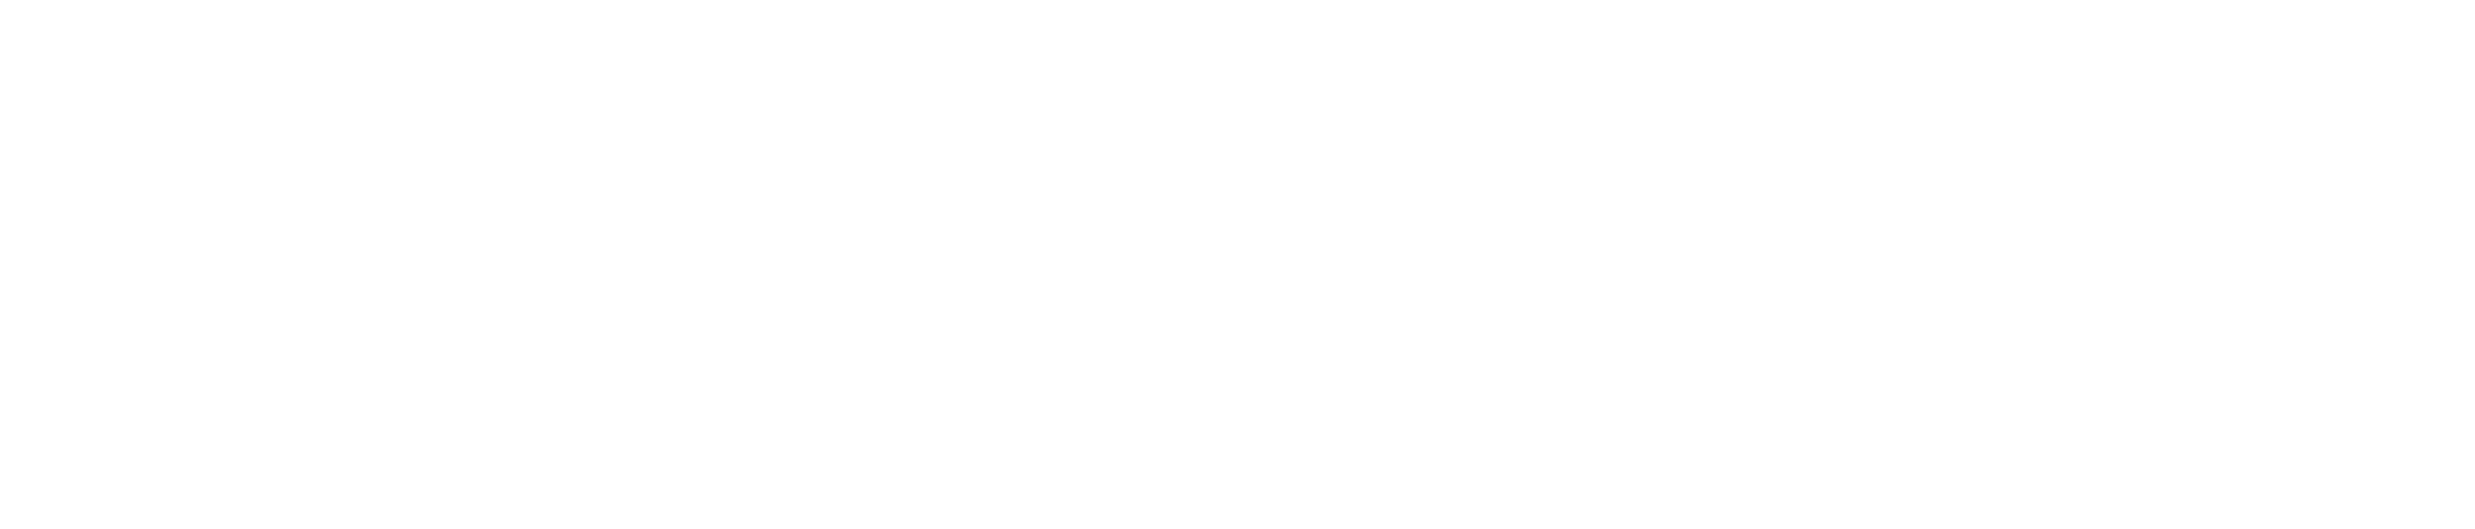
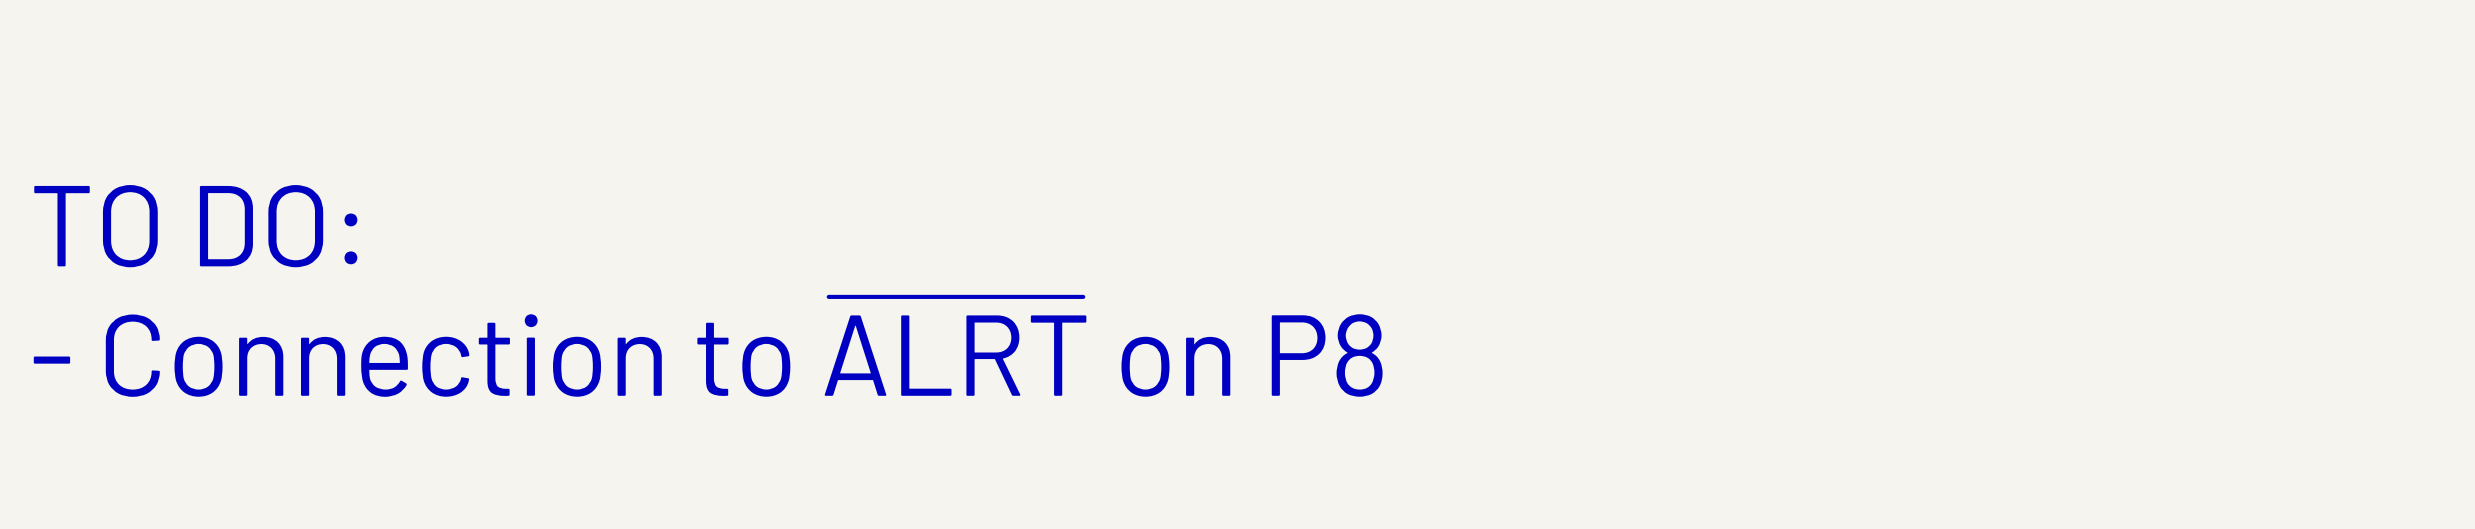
text: none -> TO DO: (195, 226)
text: none -> - Connection to ~{ALRT} on P8 (708, 346)

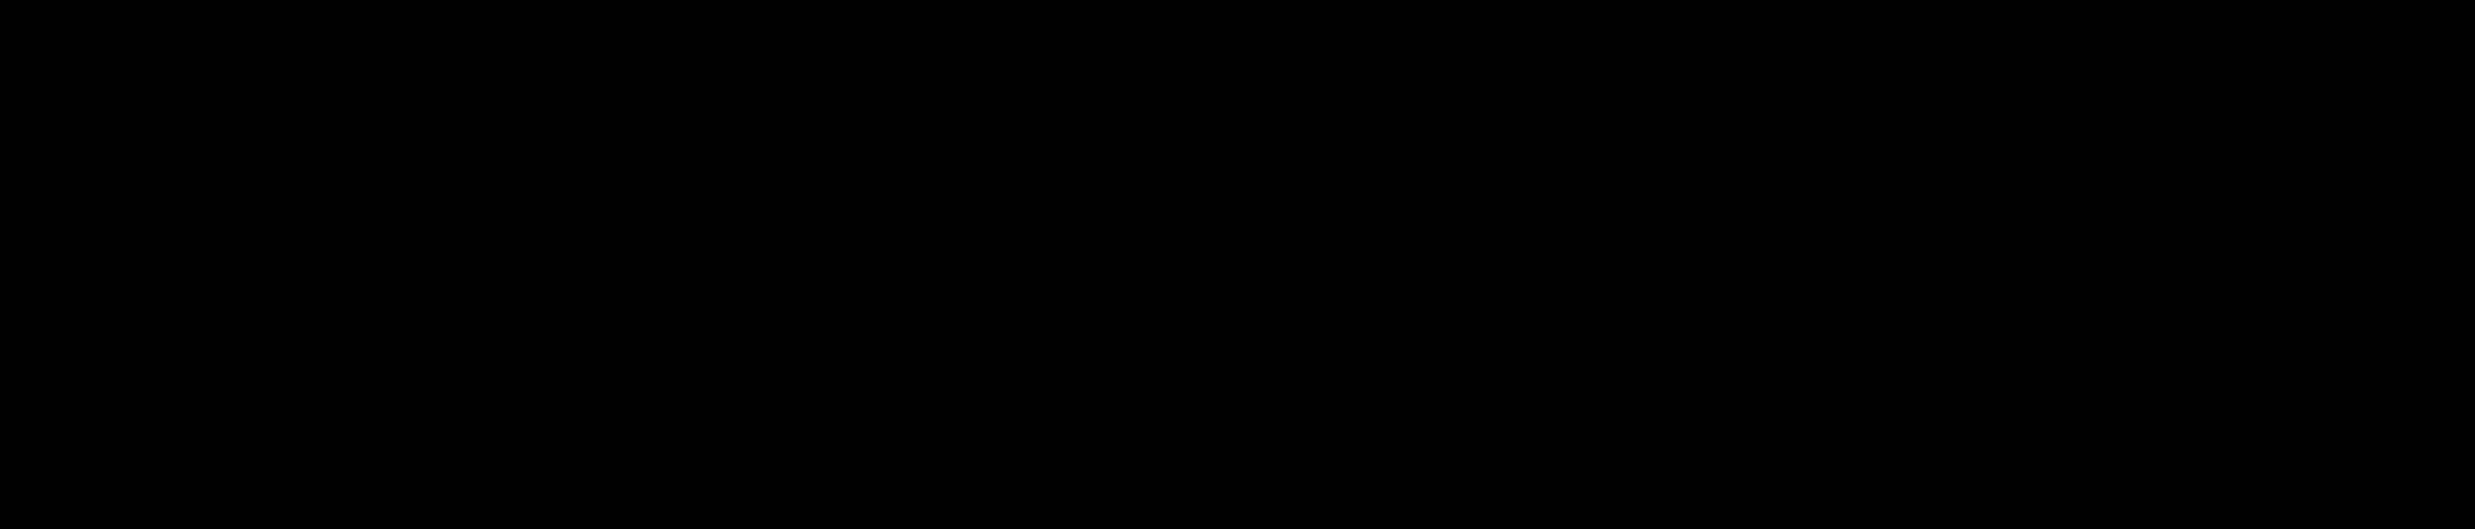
text: TO DO: (195, 226) -> none
text: - Connection to ~{ALRT} on P8 (708, 346) -> none

